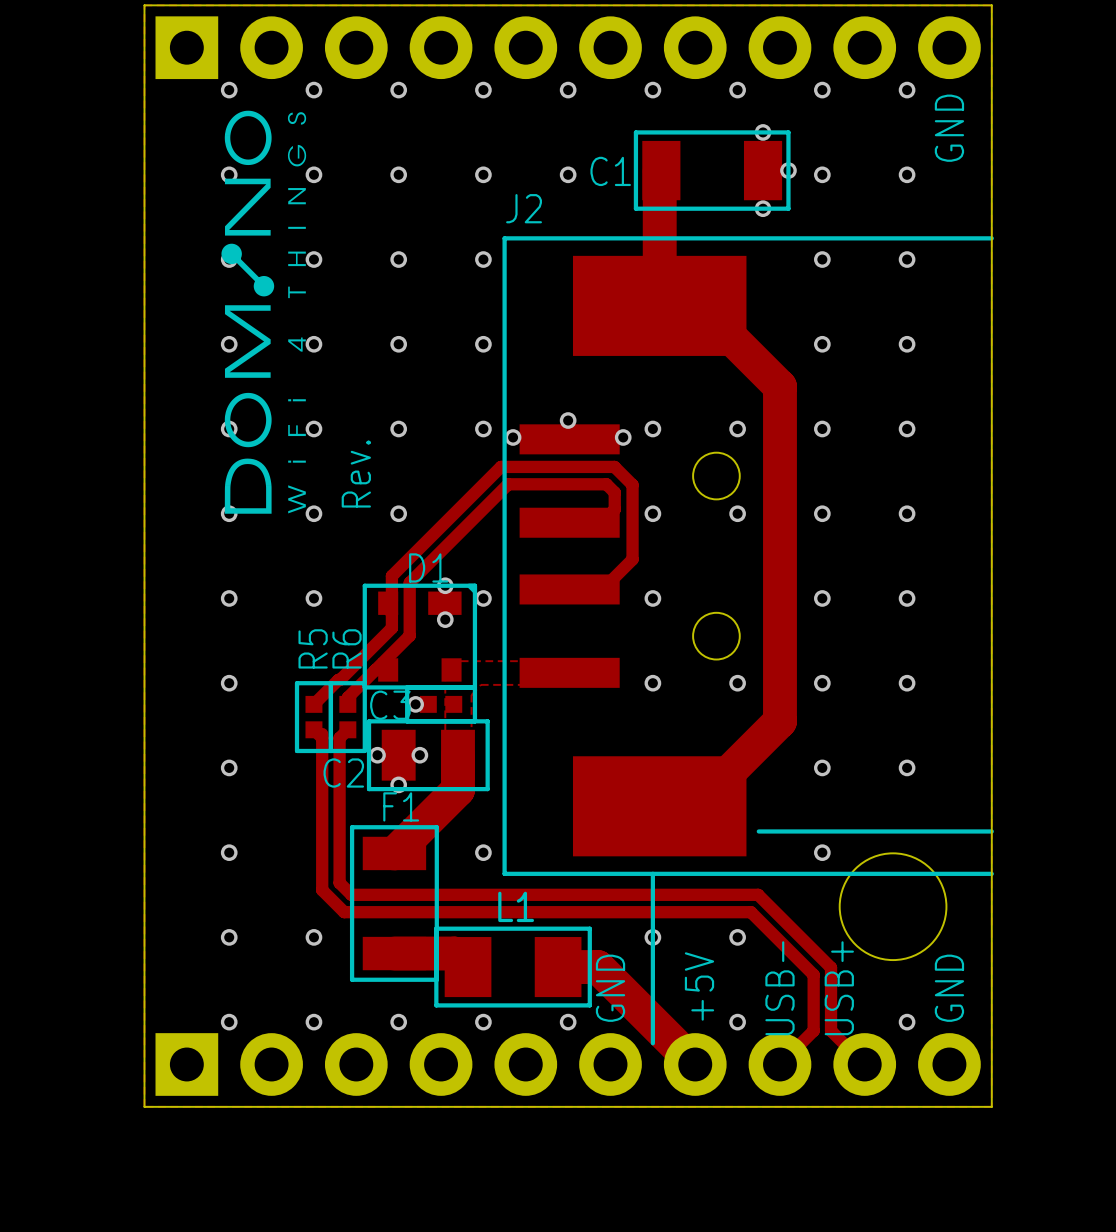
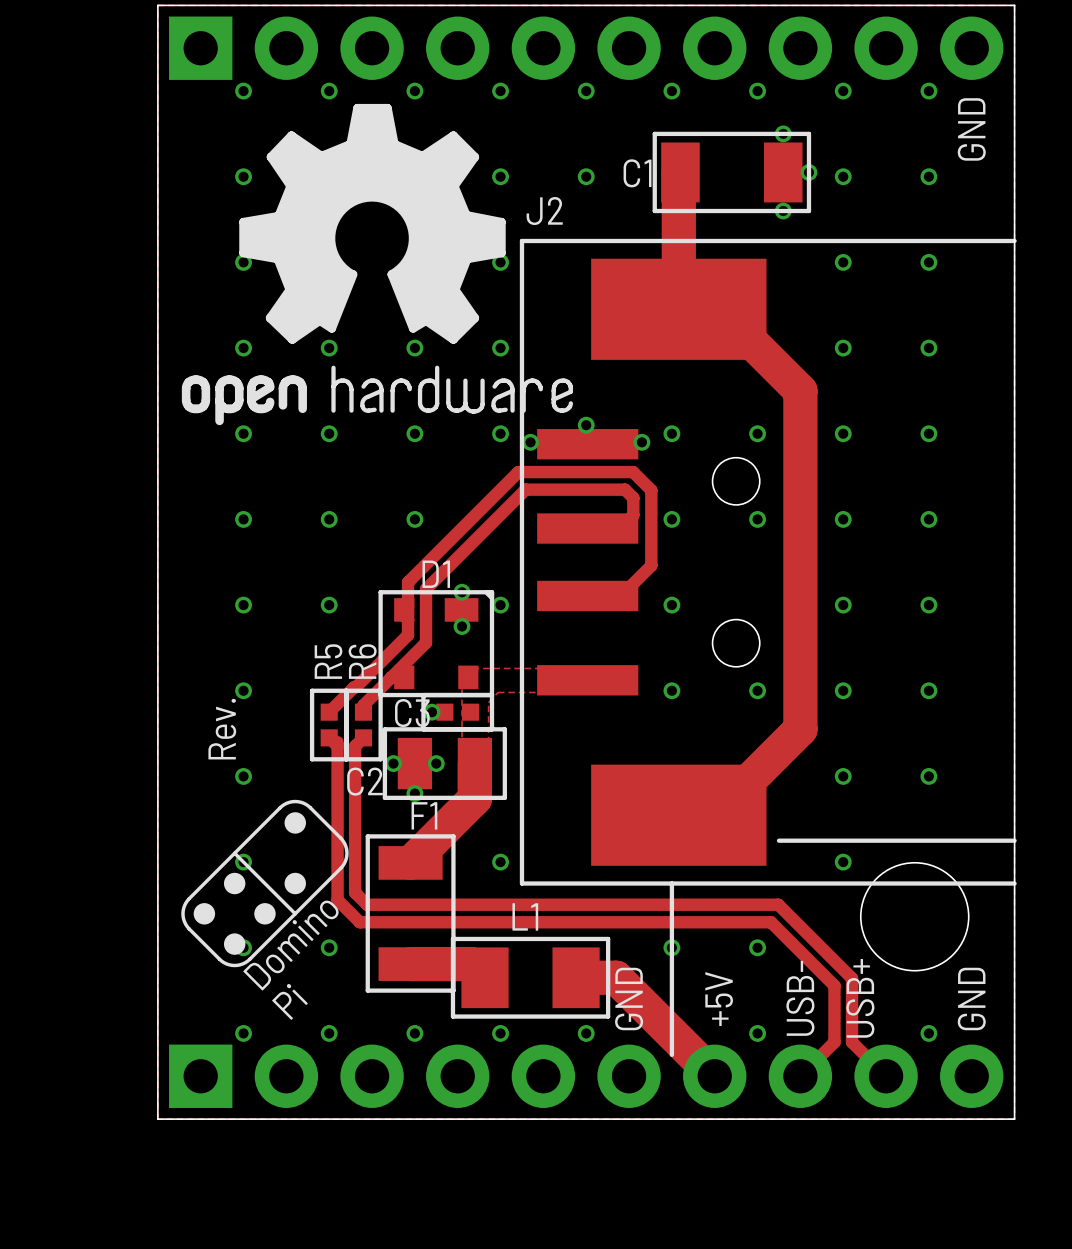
drawing: none -> [181, 103, 573, 426]
drawing: [221, 110, 307, 514] -> none
text position: Rev. (356, 473) -> Rev. (222, 729)
drawing: none -> [181, 799, 349, 968]

